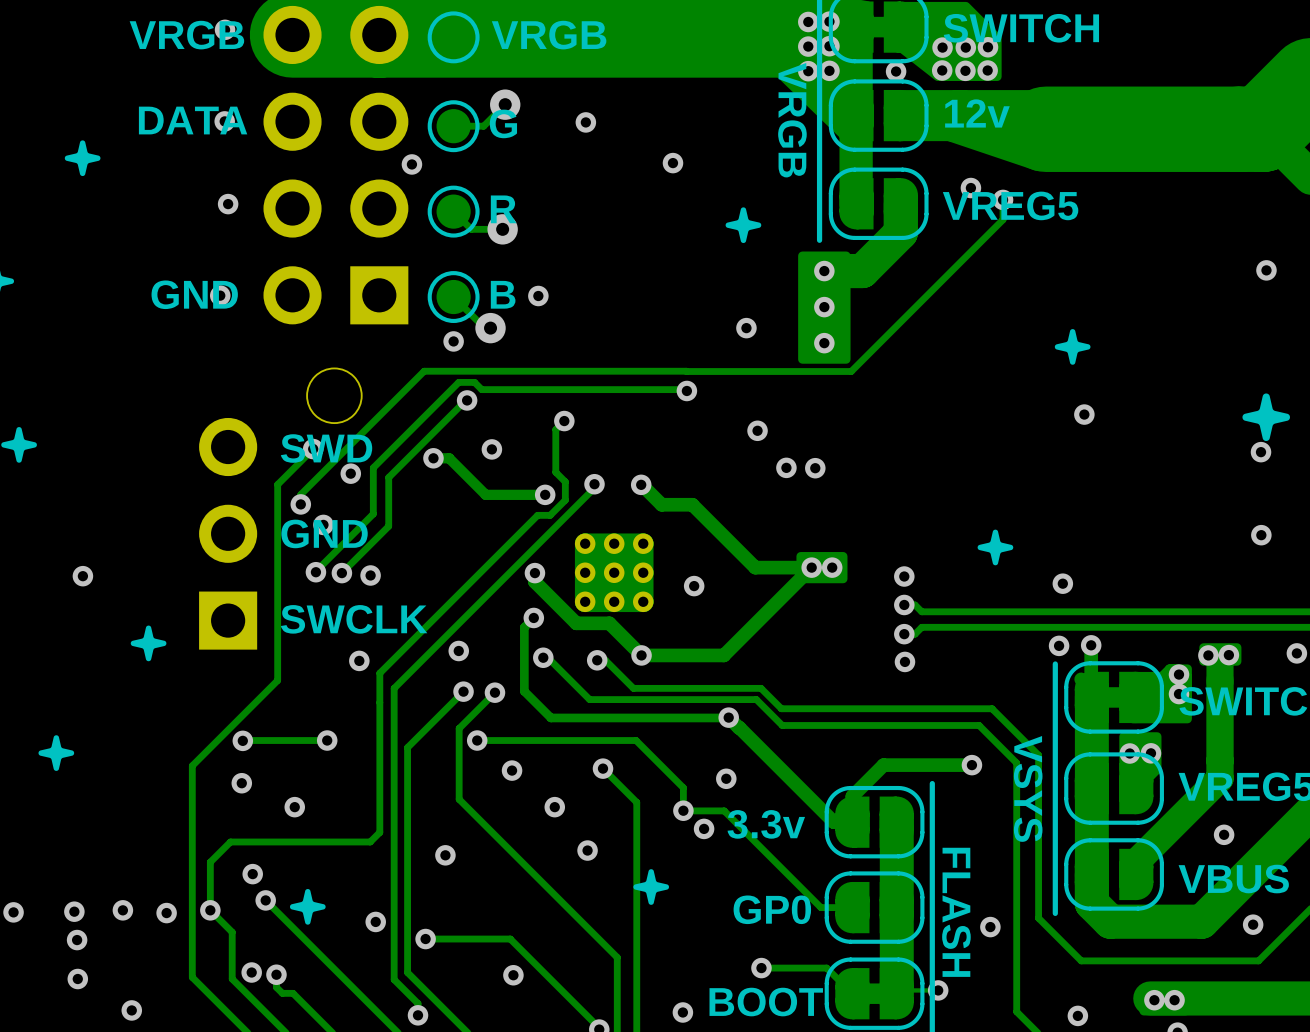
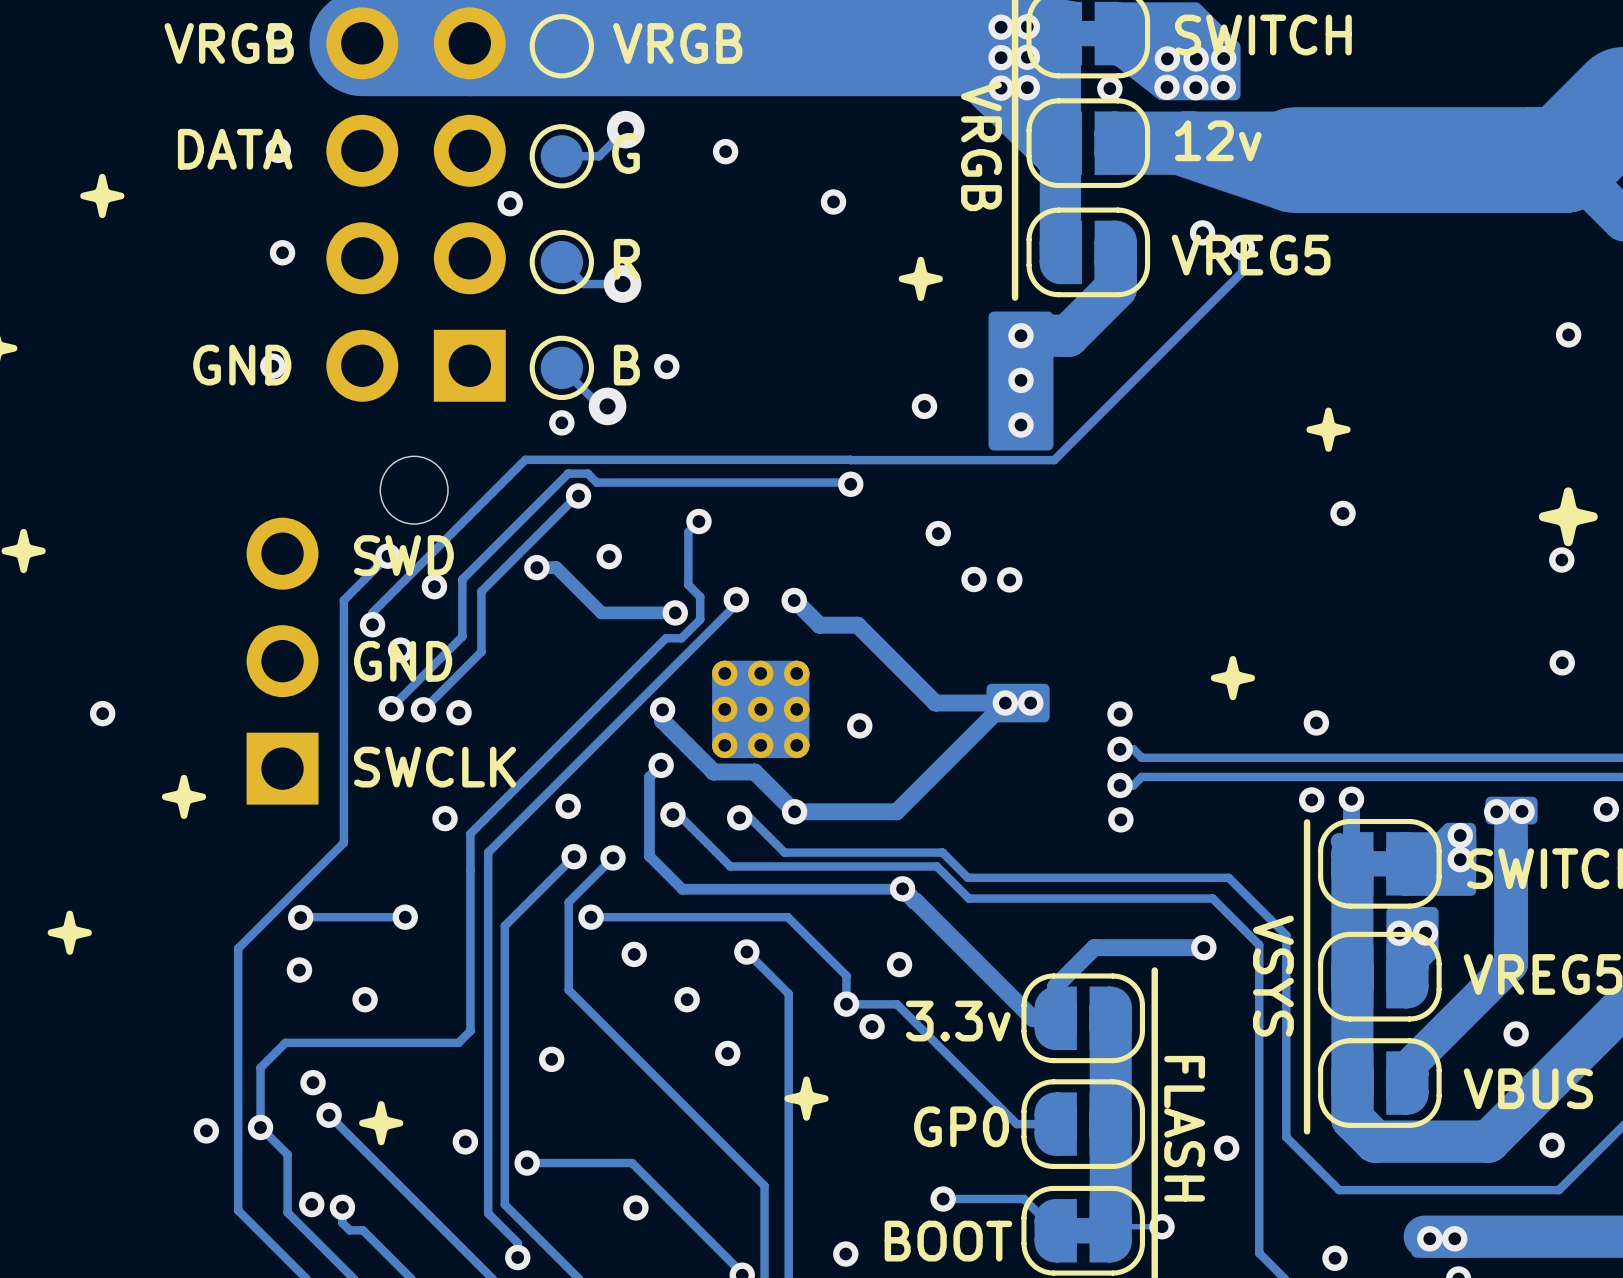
via: (122, 910) -> none
via: (74, 911) -> none
via: (13, 912) -> none
via: (77, 940) -> none
via: (77, 979) -> none
via: (131, 1010) -> none

